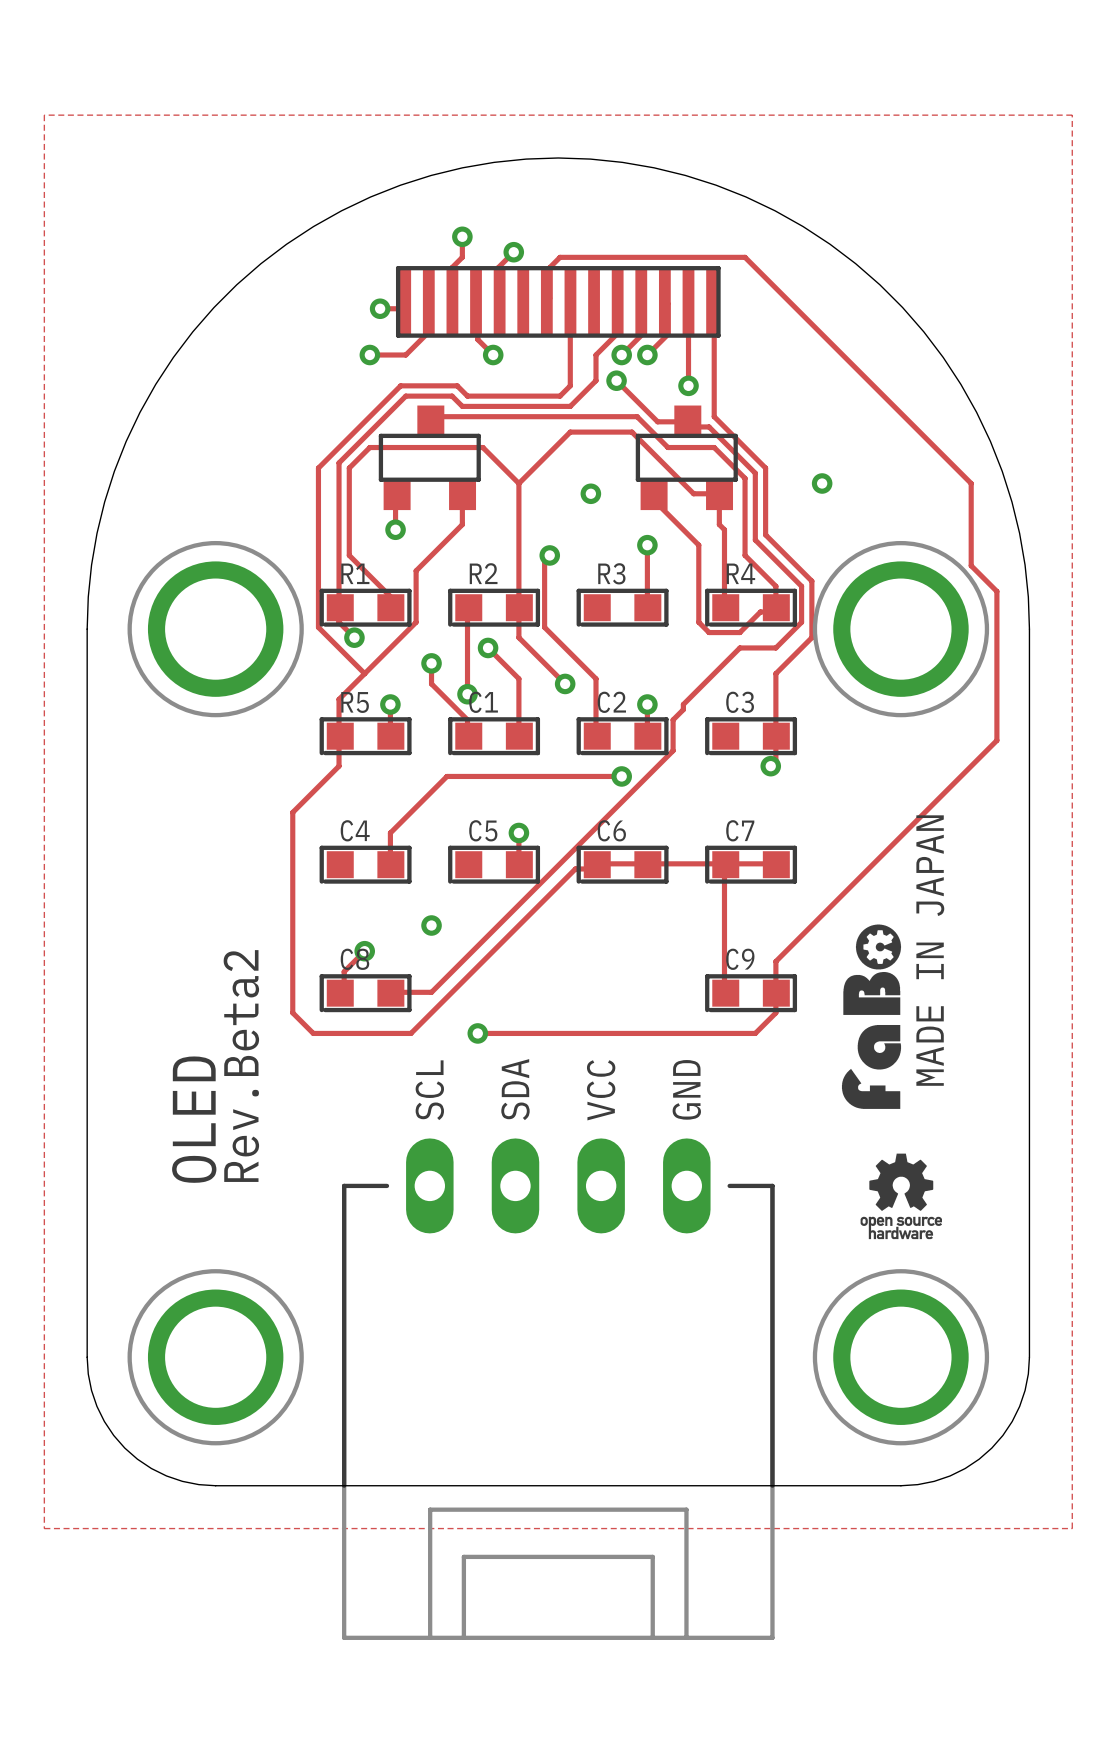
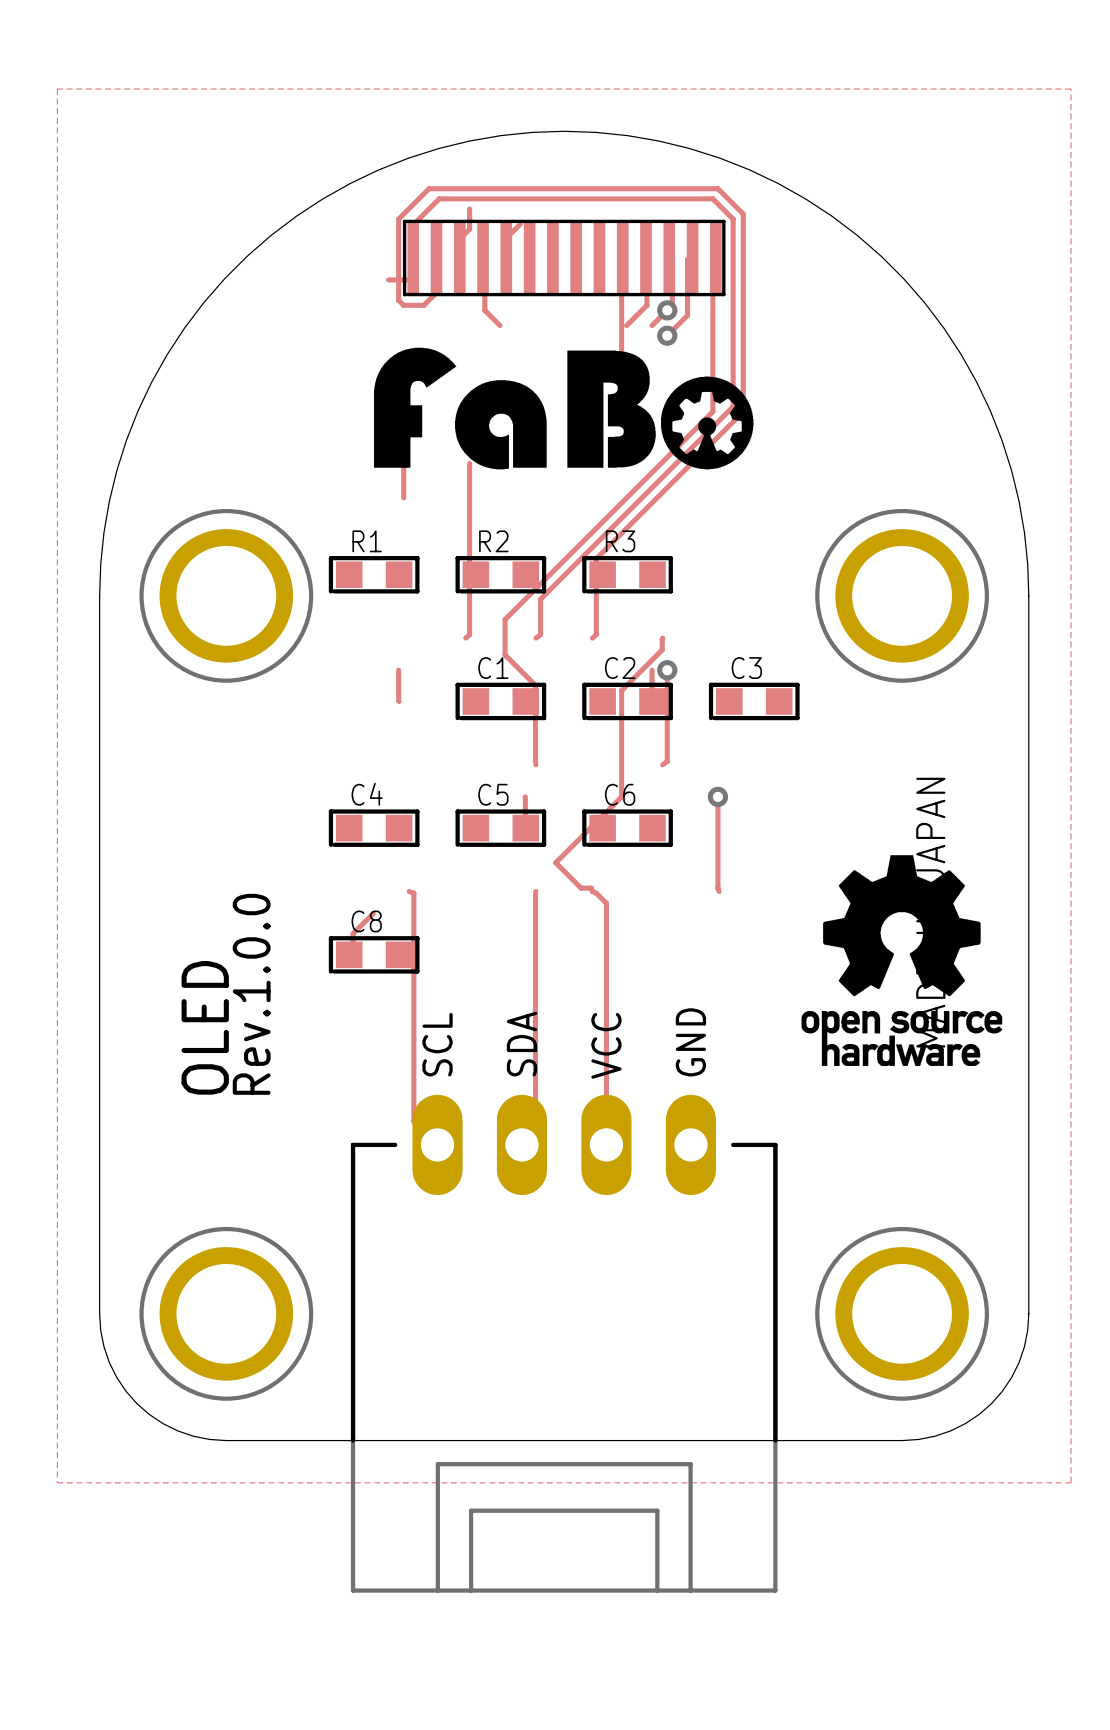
part footprint: [87, 157, 1030, 1640] -> [99, 131, 1029, 1593]
via: (462, 236) -> none
via: (513, 252) -> none
part footprint: [395, 266, 721, 338] -> [402, 219, 726, 297]
track: none -> (413, 257) (413, 224) (439, 198) (712, 198) (733, 219) (733, 406) (540, 599) (540, 634) (535, 638)
track: none -> (692, 257) (687, 259) (687, 315) (667, 335)
track: none -> (715, 257) (712, 259) (712, 411) (505, 619) (505, 655) (535, 685) (535, 764)
track: (546, 301) (549, 298) (549, 267) (560, 257) (745, 257) (971, 483) (971, 565) (996, 591) (996, 740) (775, 961) (775, 1012) (755, 1033) (477, 1033) -> none
track: (570, 301) (570, 385) (560, 396) (467, 396) (457, 385) (400, 385) (318, 468) (318, 627) (364, 673) -> none
track: (688, 301) (688, 385) -> none
track: (712, 301) (714, 303) (714, 416) (765, 468) (765, 534) (811, 581) (811, 637) (775, 673) (775, 761) (770, 766) -> none
via: (380, 308) -> none
track: (426, 324) (426, 334) (405, 355) (369, 355) -> (434, 295) (423, 305) (403, 305) (398, 300) (398, 219) (429, 188) (717, 188) (743, 214) (743, 411) (596, 558) (596, 634) (592, 638)
track: (616, 334) (596, 355) (596, 380) (570, 406) (462, 406) (452, 396) (405, 396) (339, 462) (339, 622) (354, 637) -> (621, 305) (621, 411)
via: none -> (667, 310)
via: (369, 355) -> none
via: (493, 355) -> none
via: (621, 355) -> none
via: (647, 355) -> none
via: none -> (667, 335)
drawing: none -> [373, 347, 754, 470]
track: (616, 380) (657, 421) (687, 420) (683, 426) (709, 426) (755, 473) (755, 540) (801, 586) (801, 622) (775, 647) (739, 647) (683, 704) (683, 709) (673, 719) (673, 750) (431, 992) (390, 993) -> none
via: (616, 380) -> none
via: (688, 385) -> none
track: (430, 420) (431, 416) (637, 416) (667, 447) (714, 447) (745, 478) (745, 555) (775, 586) (775, 611) (760, 611) (739, 632) (709, 632) (698, 622) (698, 545) (652, 498) (654, 494) -> none
part: (429, 457) -> none
part: (686, 457) -> none
track: (518, 483) (482, 447) (369, 447) (349, 468) (349, 555) (390, 596) (390, 607) -> none
track: (518, 483) (518, 637) (565, 683) -> none
track: (518, 483) (570, 432) (631, 432) (693, 493) (719, 493) (719, 524) (724, 529) (725, 607) -> none
via: (822, 483) -> none
via: (590, 493) -> none
track: (462, 524) (416, 570) (416, 622) (339, 699) (339, 766) (292, 812) (292, 1012) (313, 1033) (410, 1033) (575, 868) (596, 868) (597, 864) (601, 863) (725, 864) -> (469, 492) (469, 634) (465, 638)
via: (395, 529) -> none
track: (647, 545) (647, 607) -> none
via: (647, 545) -> none
track: (549, 555) (544, 560) (544, 627) (596, 678) (597, 736) -> none
via: (549, 555) -> none
track: (468, 607) (467, 694) -> none
R4: (751, 607) -> none
via: (354, 637) -> none
track: (488, 647) (518, 678) (519, 736) -> none
via: (488, 647) -> none
track: (431, 663) (431, 683) (467, 719) (468, 736) -> none
via: (431, 663) -> none
track: none -> (662, 638) (662, 649) (621, 690) (621, 796) (555, 862) (581, 888) (591, 888) (592, 891) (606, 903) (606, 1144)
via: (565, 683) -> none
via: (467, 694) -> none
via: (390, 704) -> none
via position: (647, 704) -> (667, 670)
track: none -> (667, 670) (667, 761) (662, 764)
R5: (365, 736) -> none
via: (770, 766) -> none
track: (621, 776) (446, 776) (390, 832) (390, 864) -> none
via: (621, 776) -> none
via: (518, 832) -> none
track: none -> (717, 796) (719, 891)
via: none -> (717, 796)
track: (725, 864) (725, 993) -> none
track: (725, 864) (776, 864) -> none
C7: (751, 864) -> none
drawing: none -> [801, 855, 1003, 1066]
drawing: [841, 924, 902, 1109] -> none
via: (431, 925) -> none
track: none -> (409, 891) (413, 893) (413, 1121) (437, 1144)
track: none -> (535, 891) (535, 1131) (521, 1144)
via: (364, 951) -> none
C9: (751, 993) -> none
text: none -> Rev.1.0.0 (251, 994)
via: (477, 1033) -> none
text: Rev.Beta2 (241, 1066) -> none
text position: OLED (194, 1119) -> OLED (205, 1027)
drawing: [860, 1153, 942, 1240] -> none

